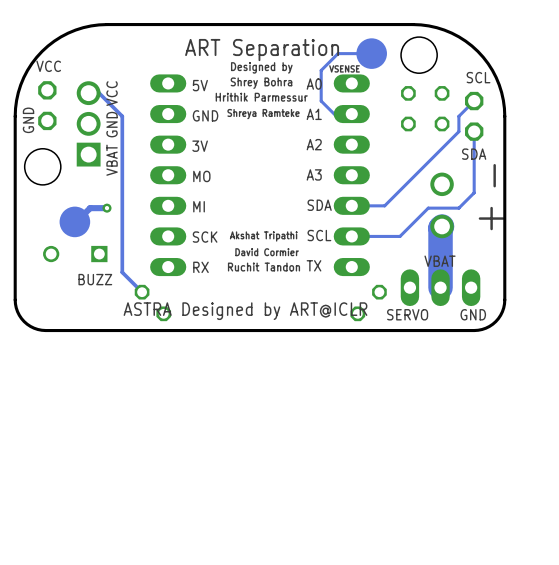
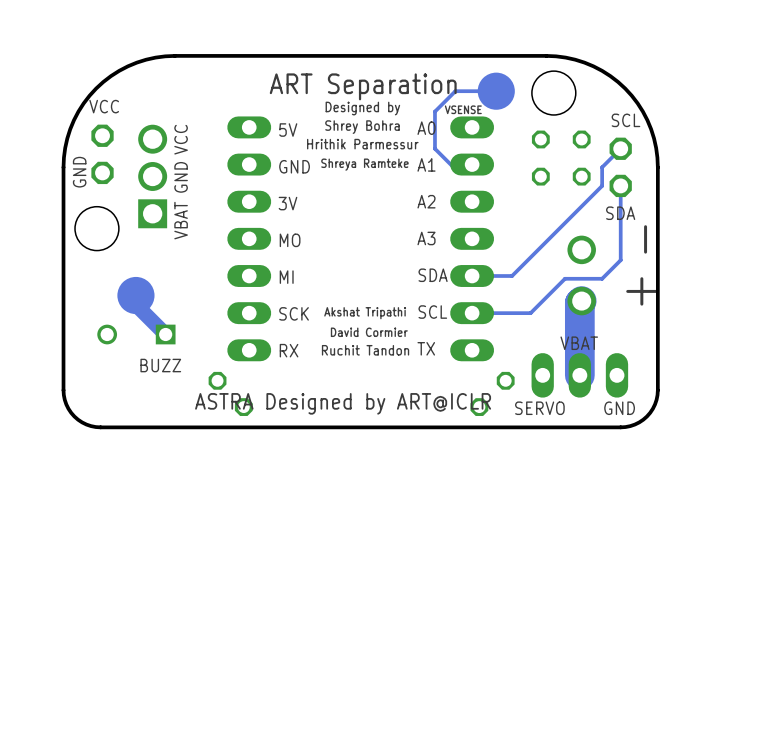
track: (88, 93) (99, 93) (122, 116) (122, 272) (142, 292) -> none
track: (107, 208) (90, 208) (74, 223) -> none
via: (107, 208) -> none
track: none -> (135, 304) (165, 334)

